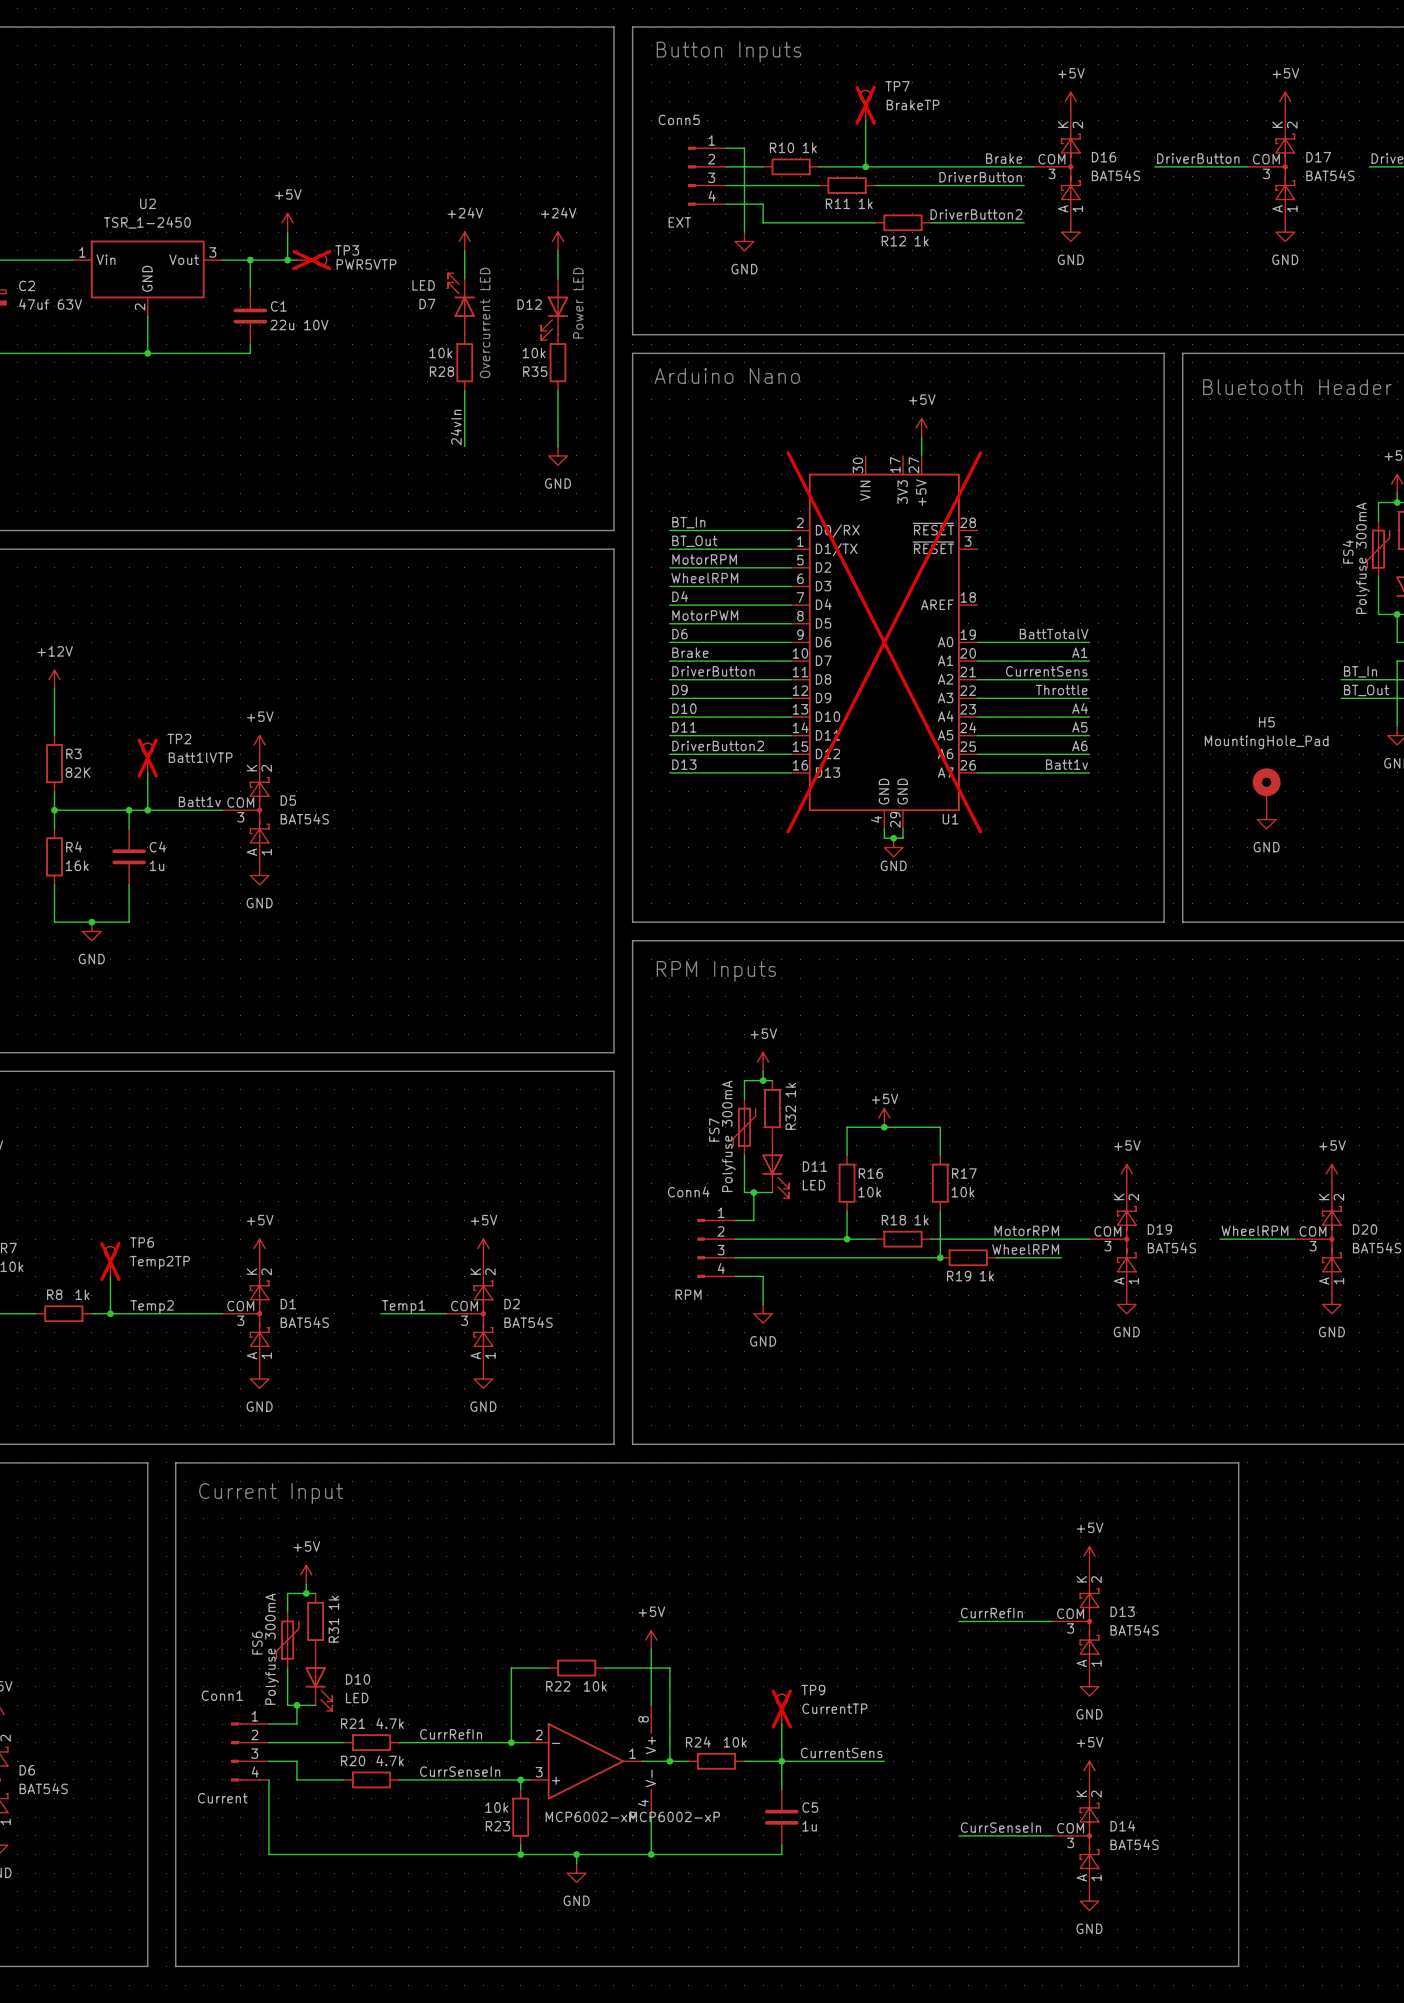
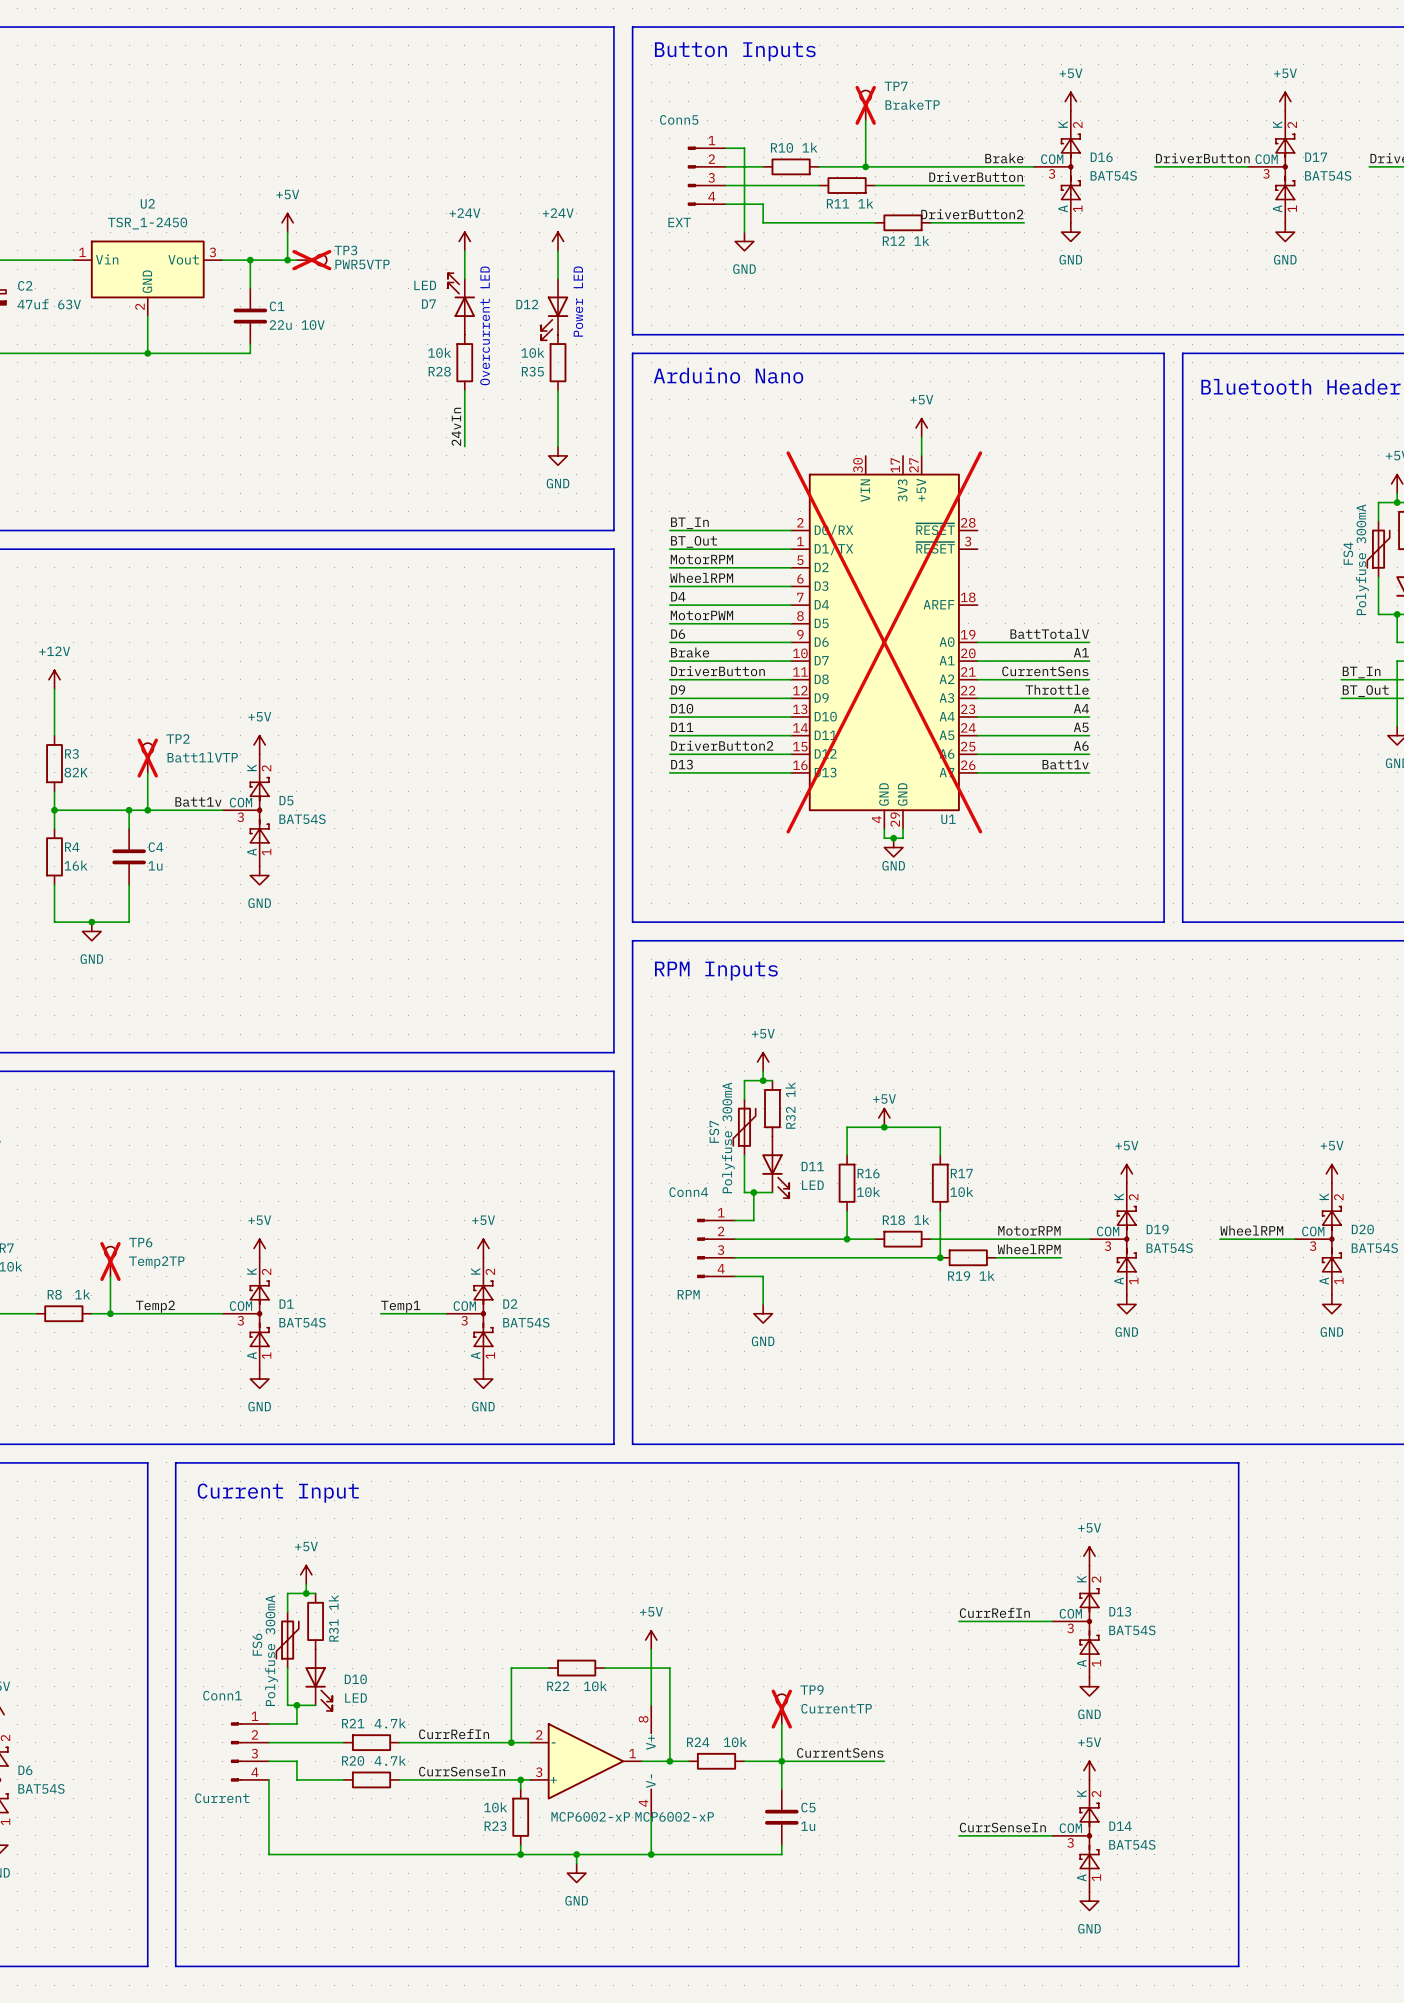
H5: MountingHole_Pad (1266, 789) -> none
power symbol: GND (1266, 819) -> none

